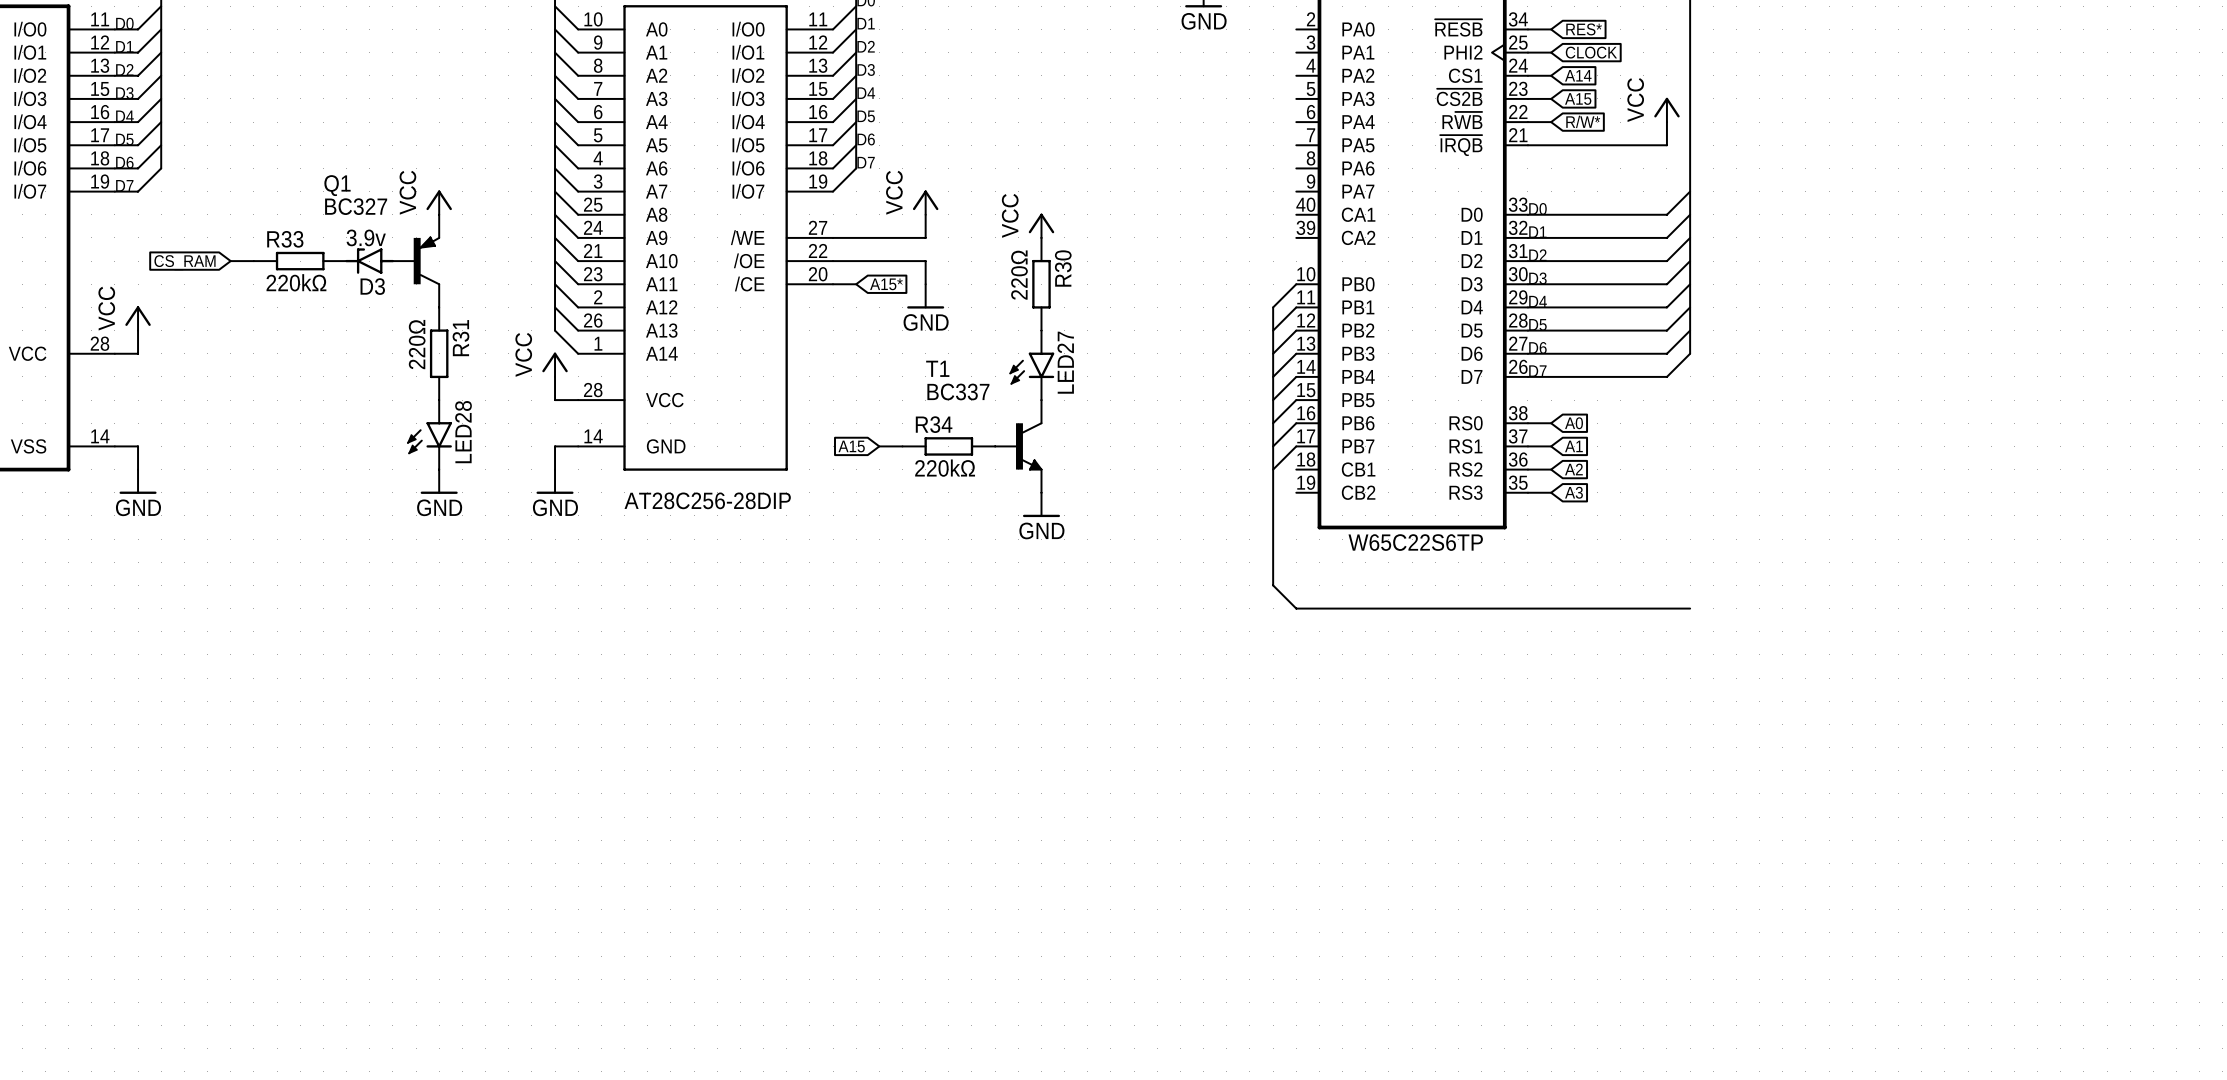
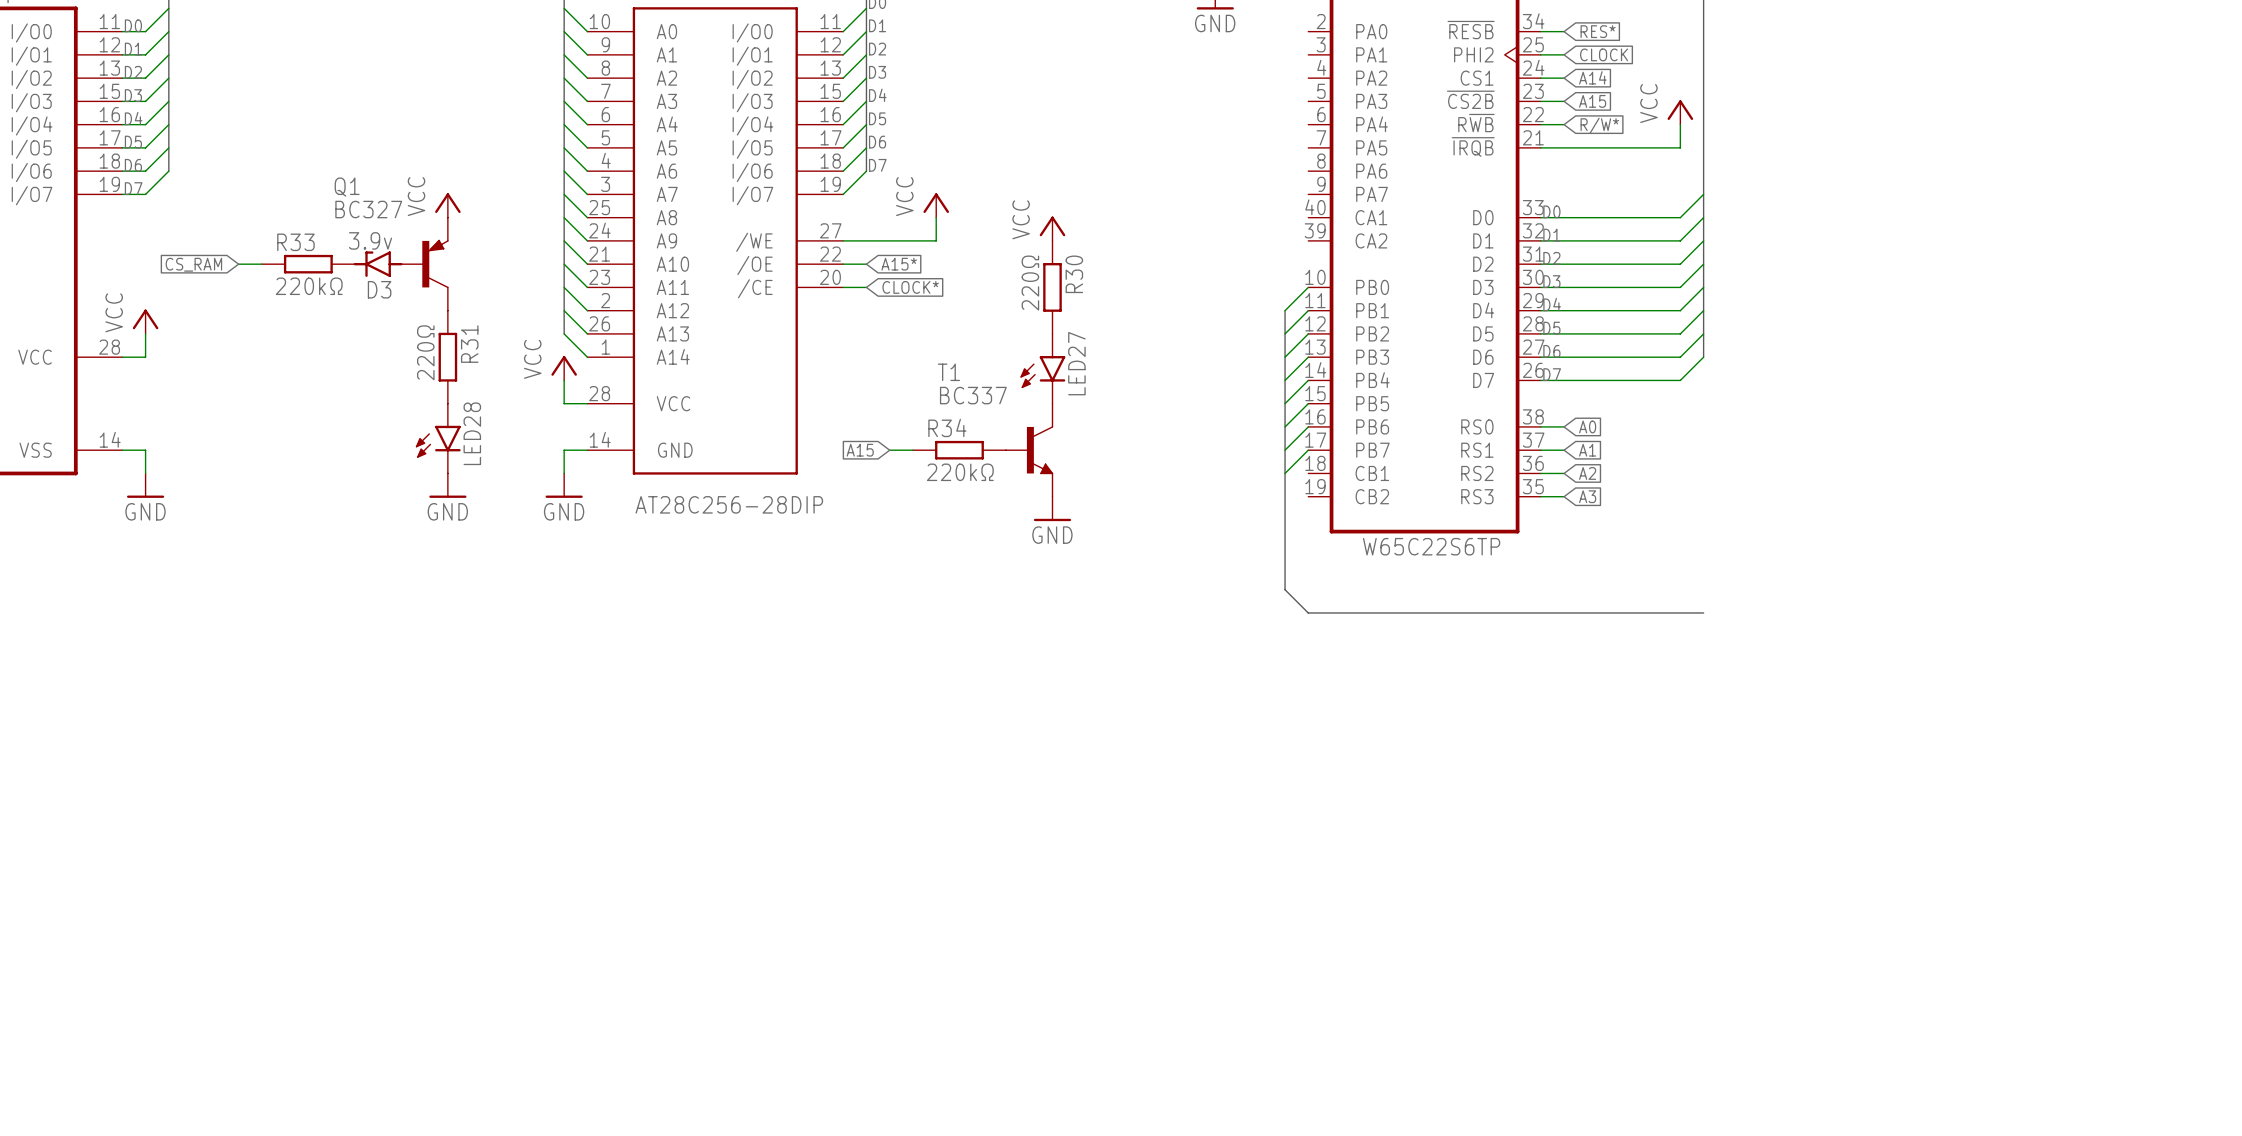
wire: (856, 261) (925, 261) (925, 284) -> none
global label: none -> A15* (899, 264)
global label: A15* (886, 284) -> CLOCK* (910, 287)
power symbol: GND (925, 296) -> none

